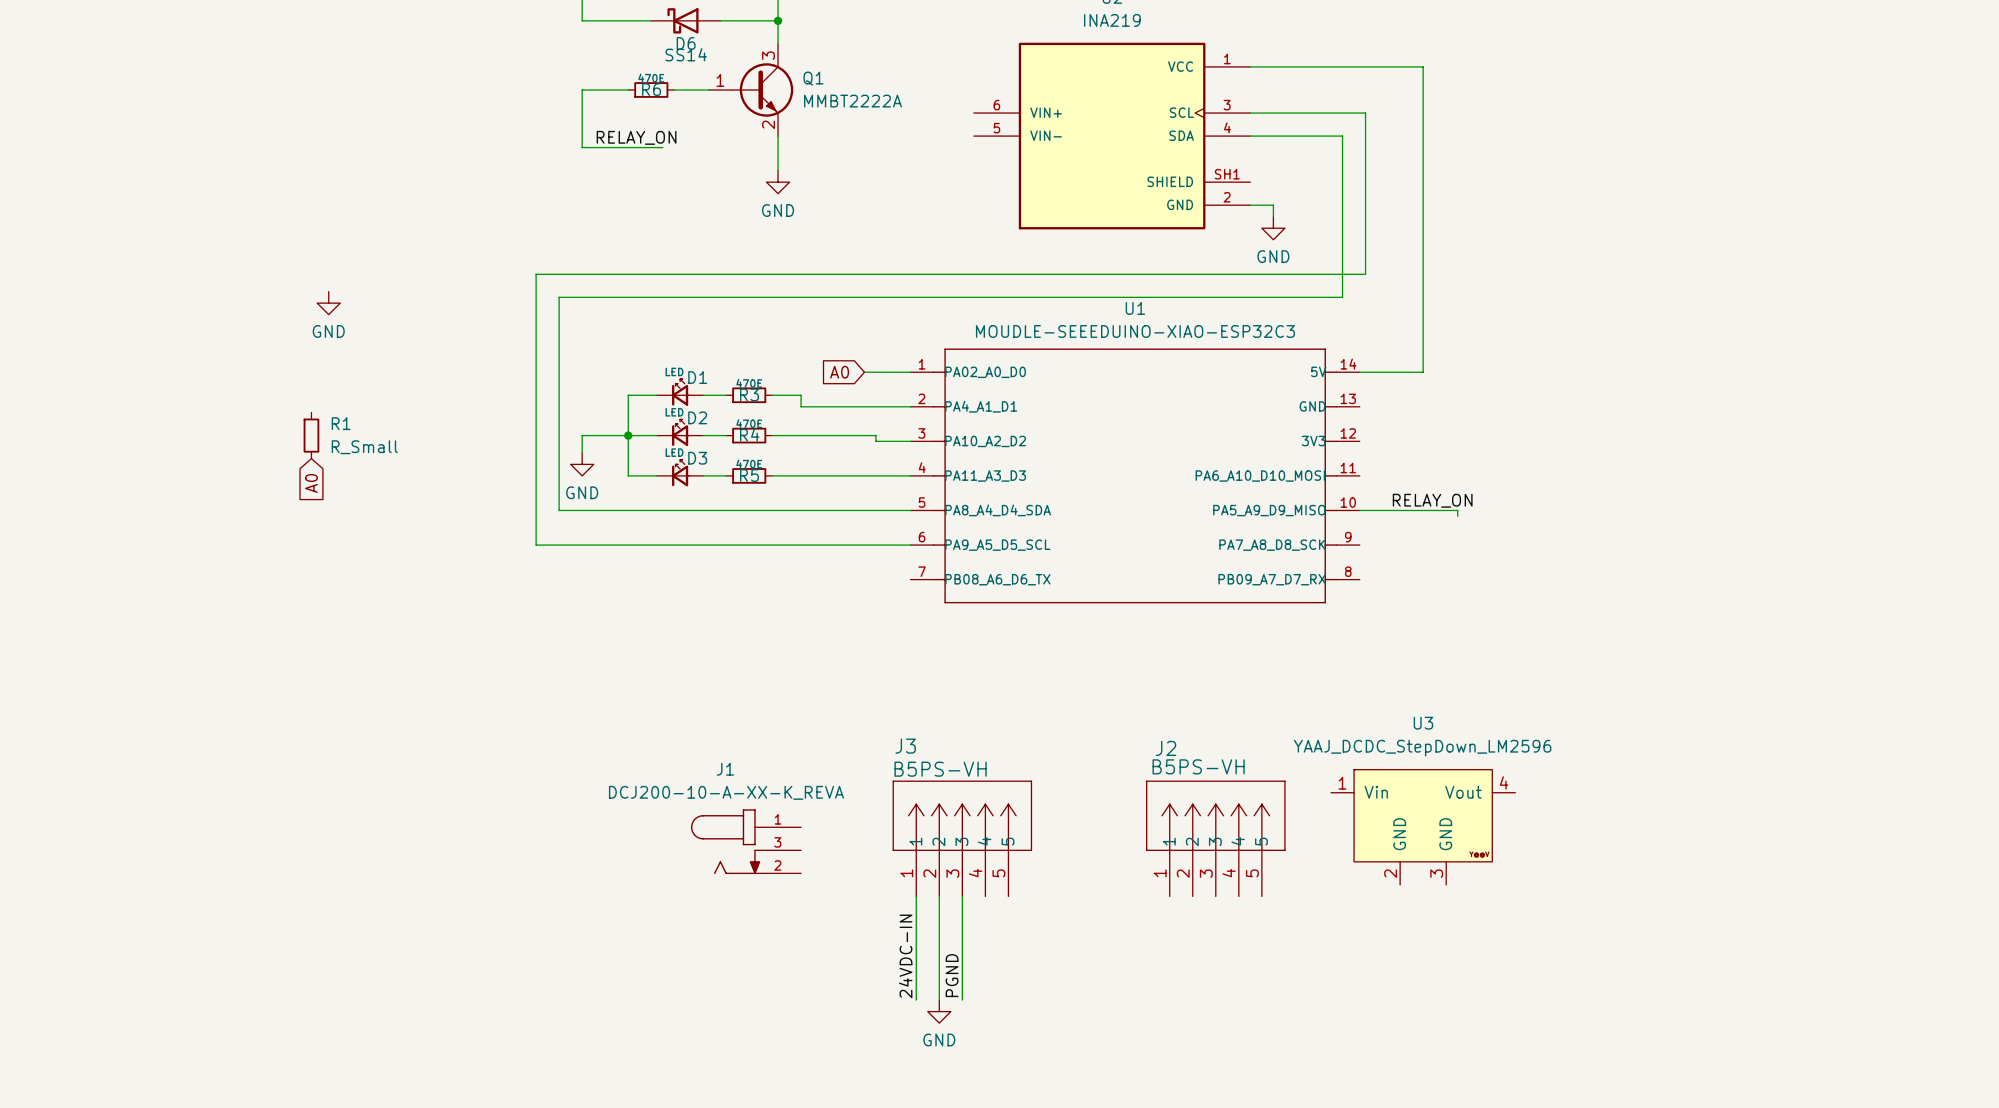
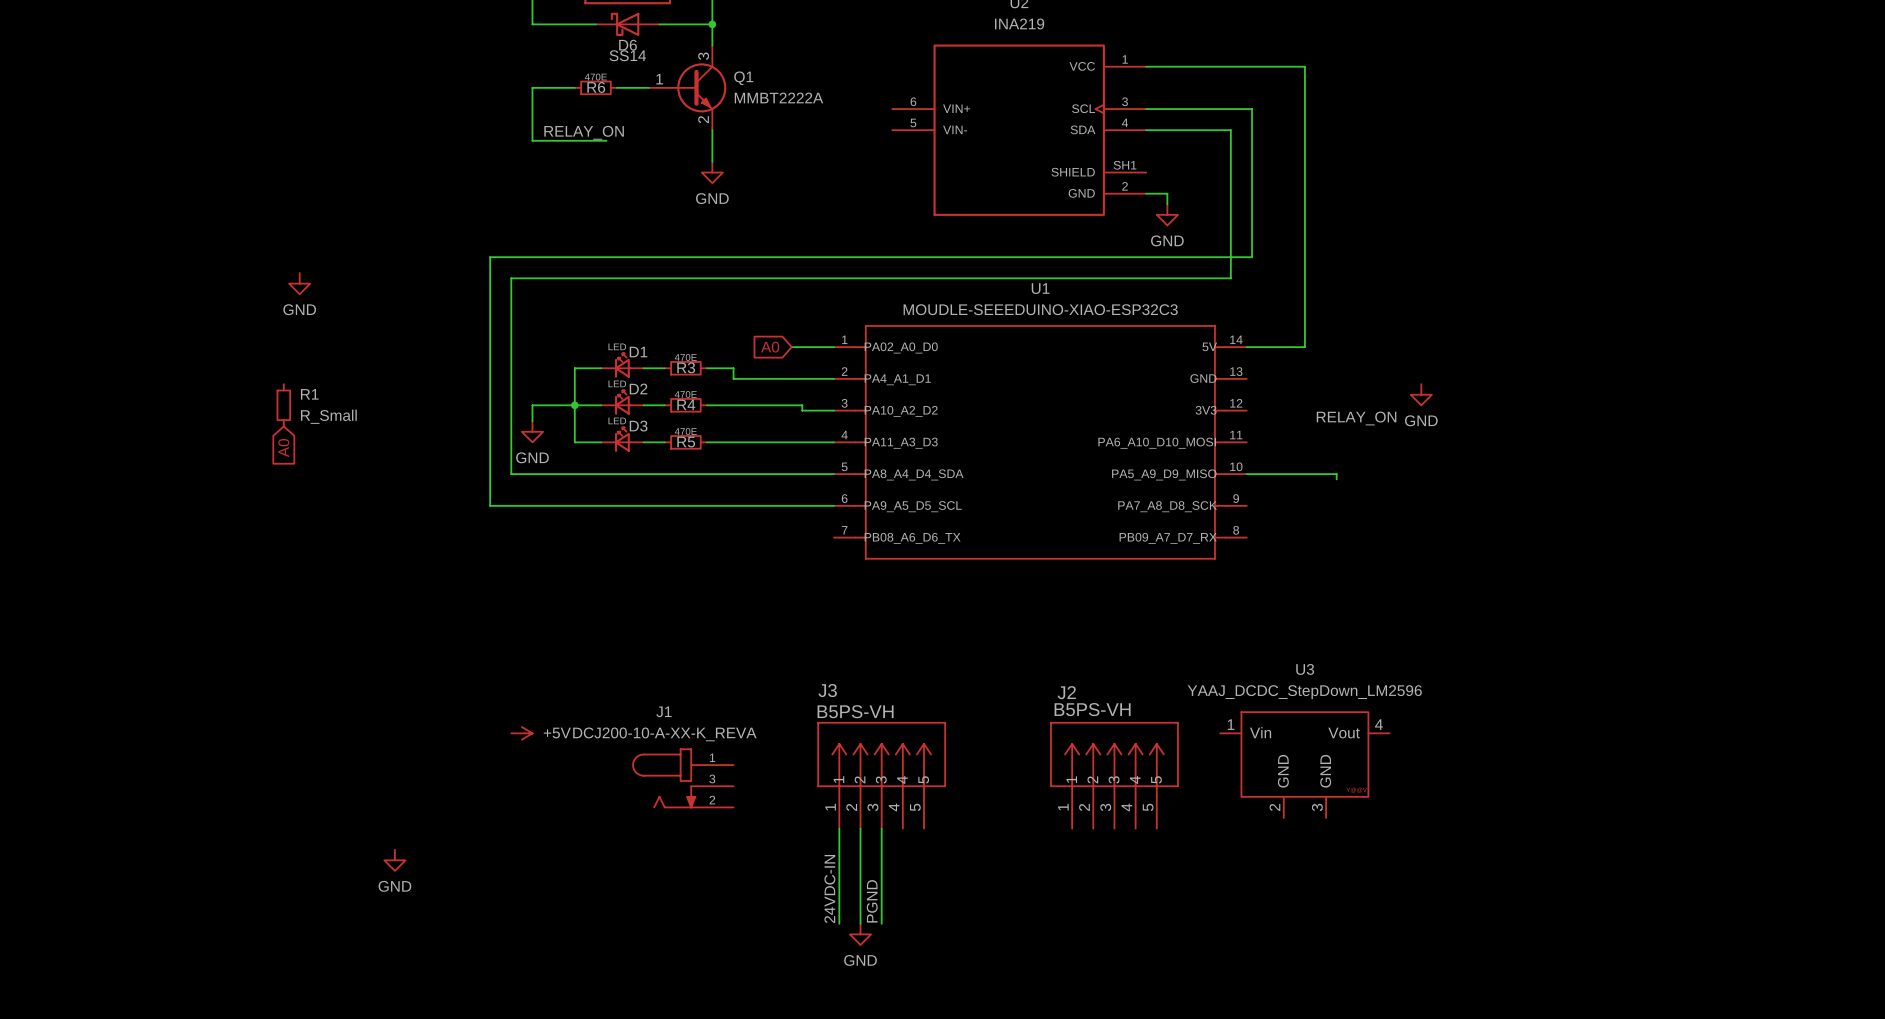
power symbol: none -> GND (1421, 394)
label position: RELAY_ON (1432, 500) -> RELAY_ON (1356, 418)
power symbol: none -> +5V (521, 733)
power symbol: none -> GND (394, 860)

